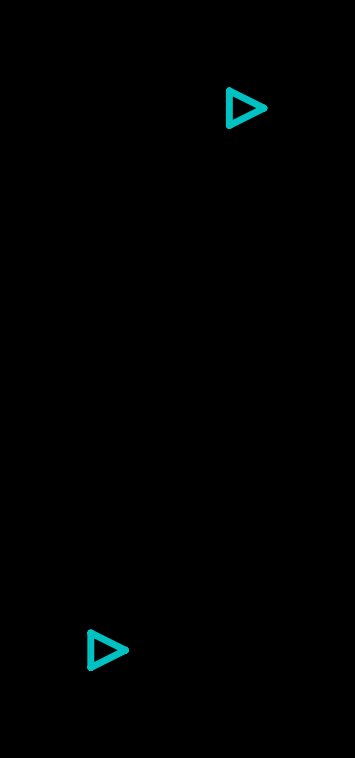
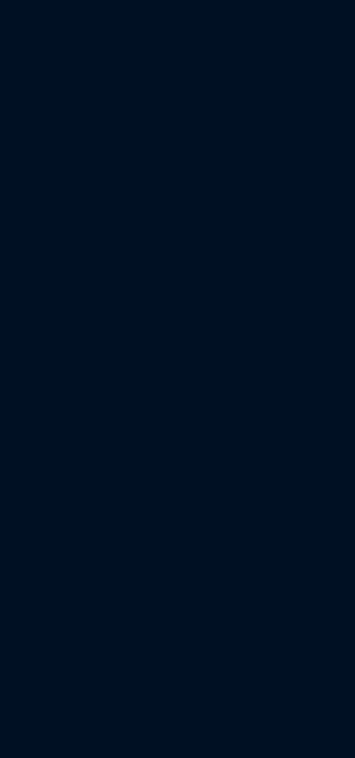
line: (229, 90) (229, 125) (264, 108) (229, 90) -> none
line: (90, 632) (90, 667) (125, 650) (90, 632) -> none

